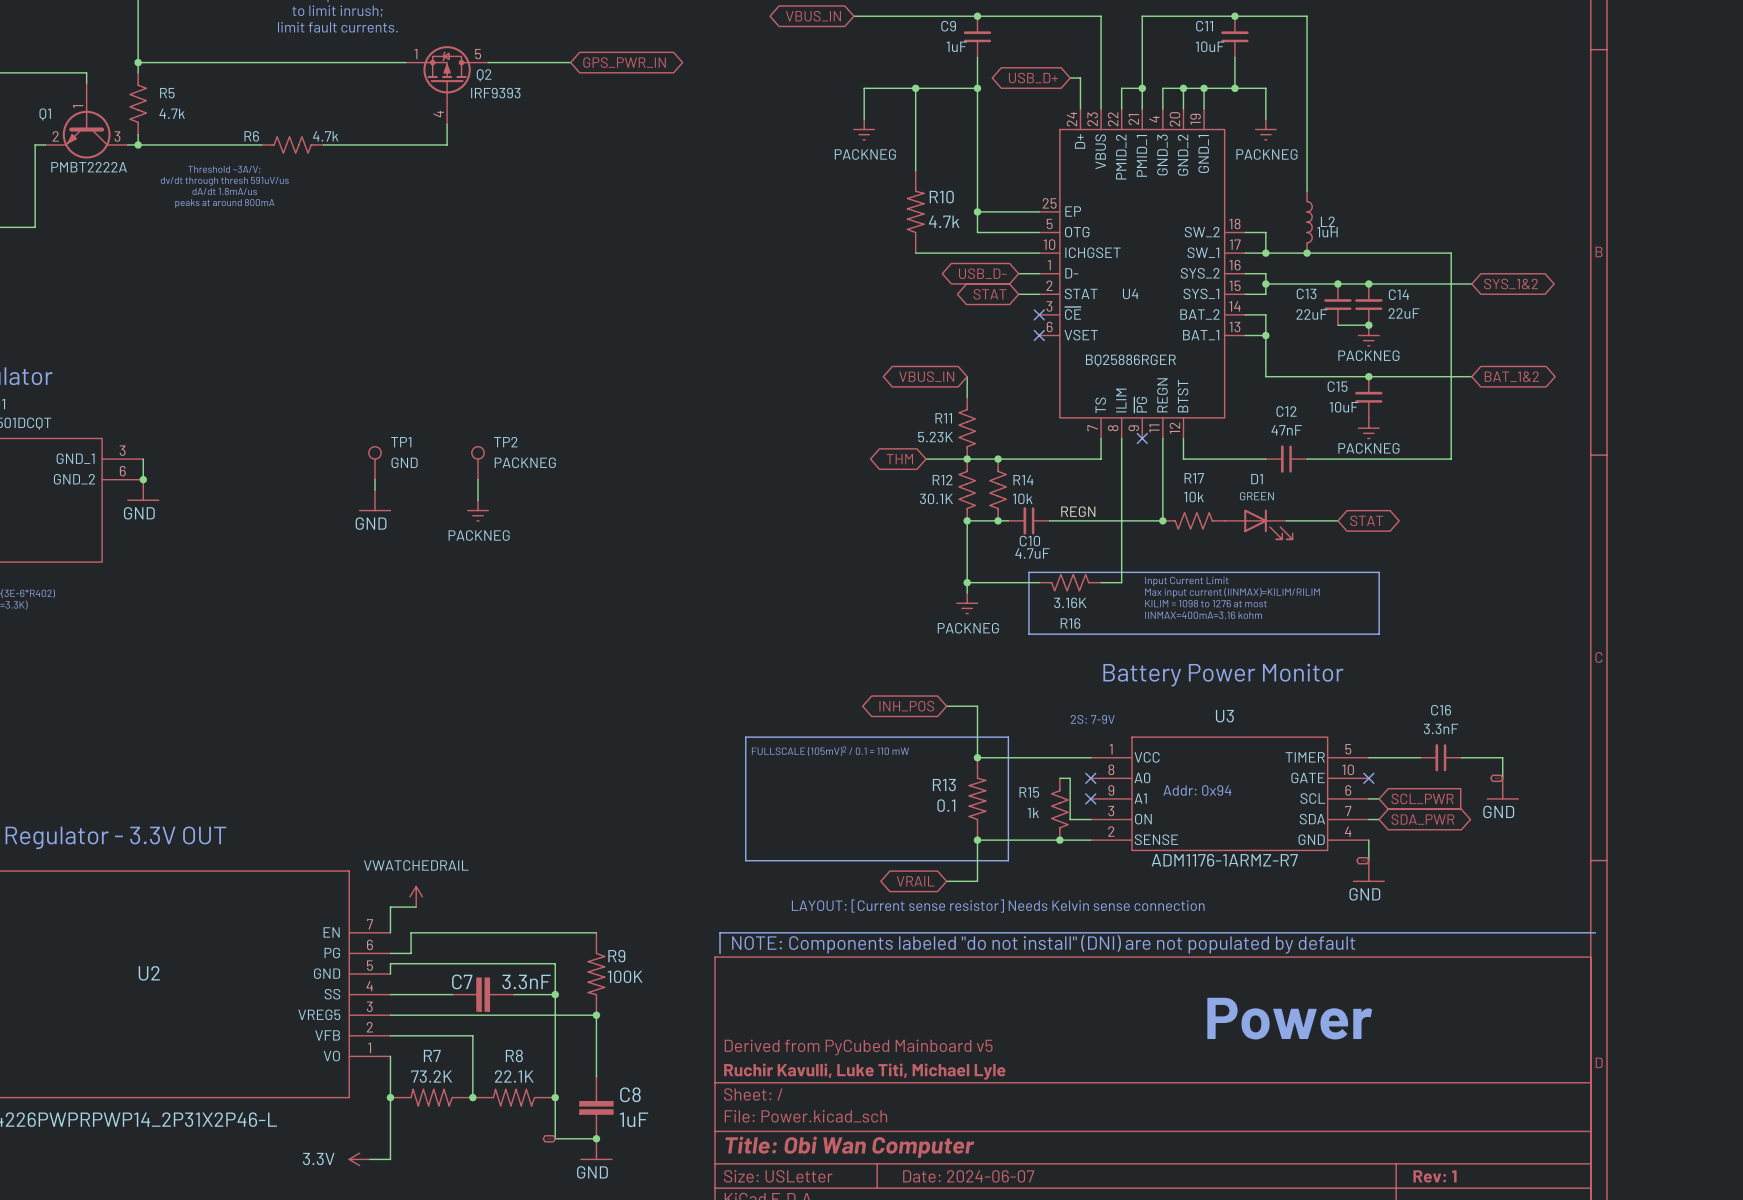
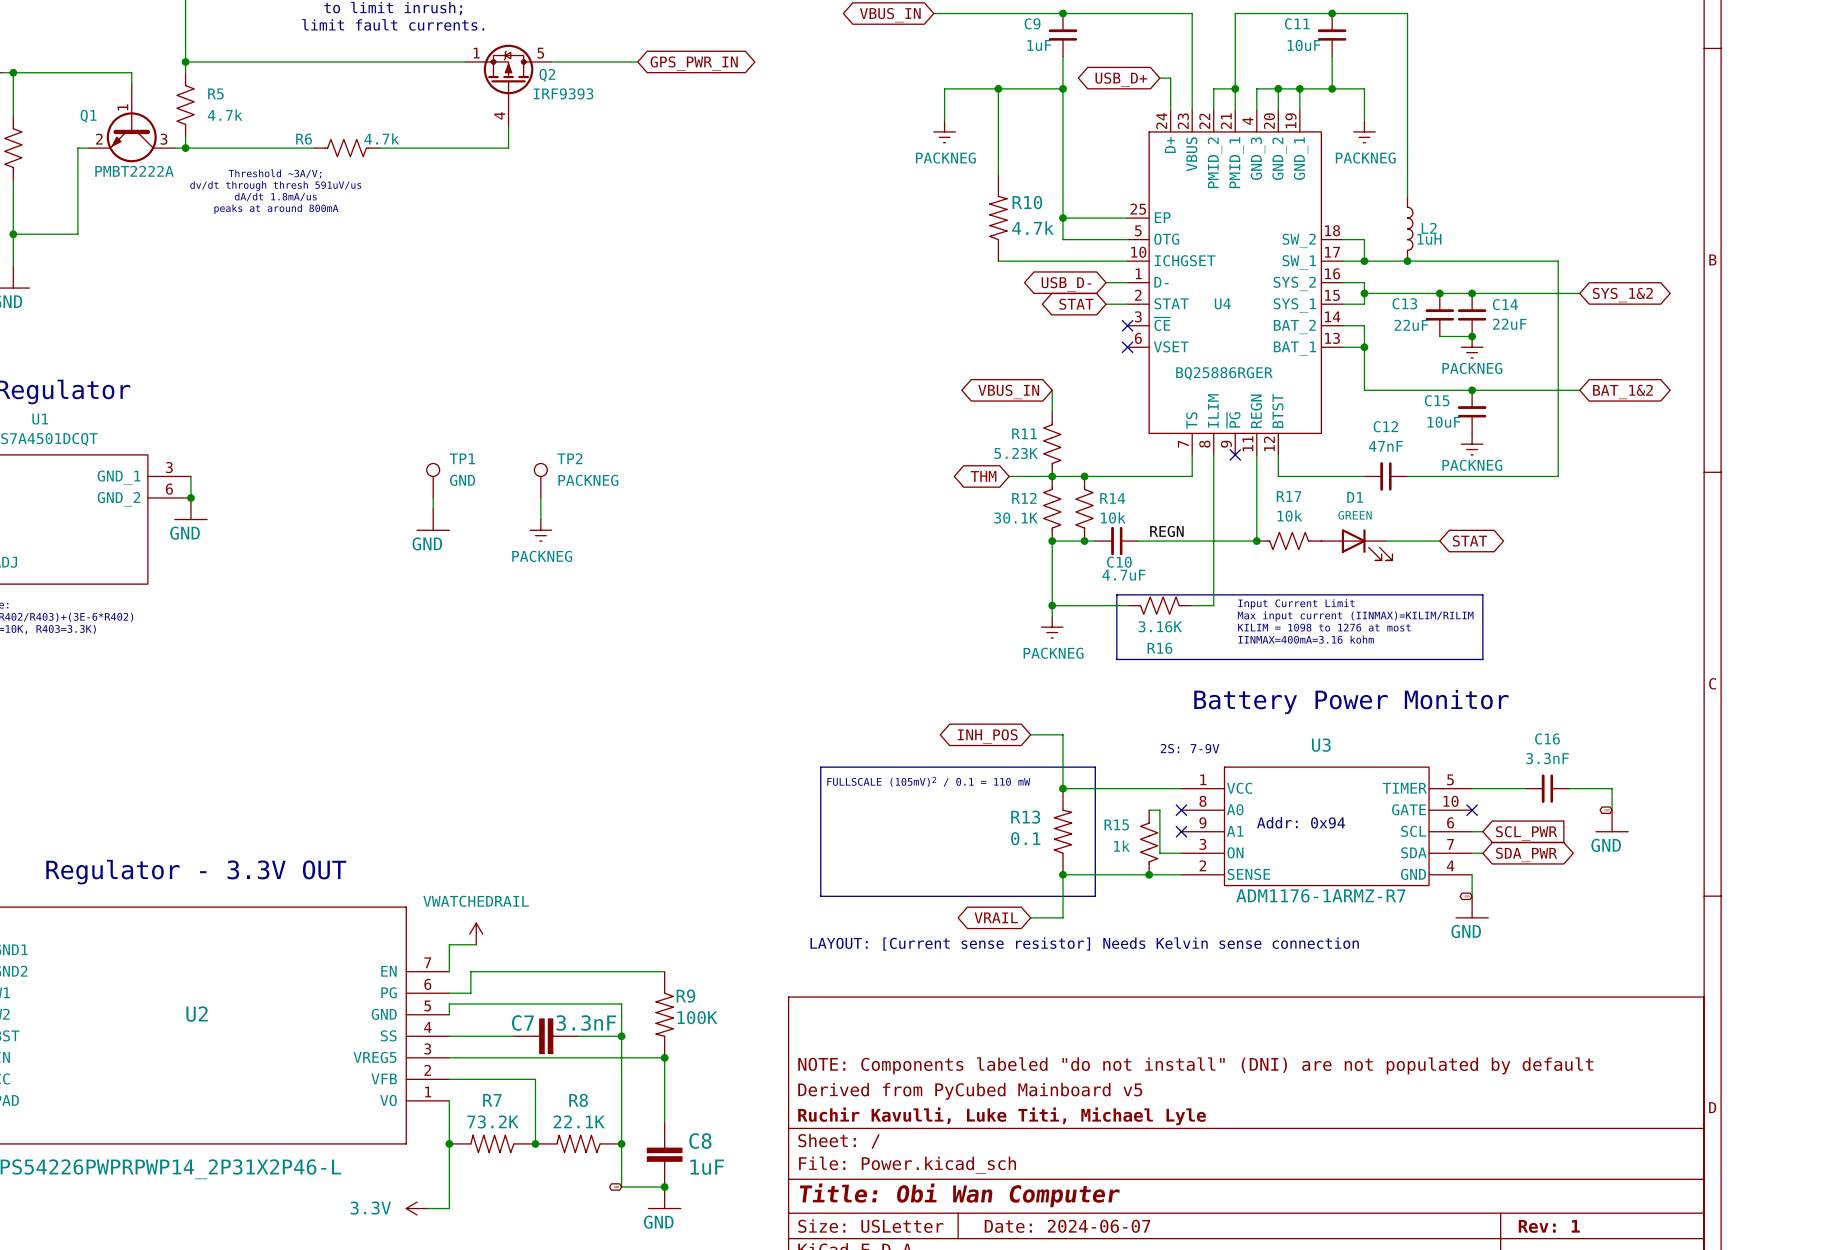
line: (1595, 932) (720, 932) (720, 953) -> none
text: NOTE: Components labeled "do not install" (DNI) are not populated by default (1043, 944) -> none
text: Power (1289, 1018) -> none
title block: none -> NOTE: Components labeled "do not install" (DNI) are not populated by default (1195, 1065)

